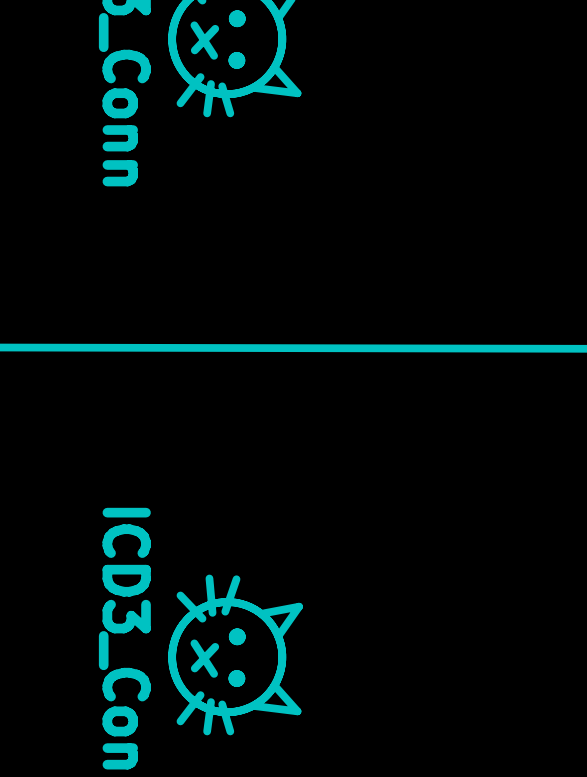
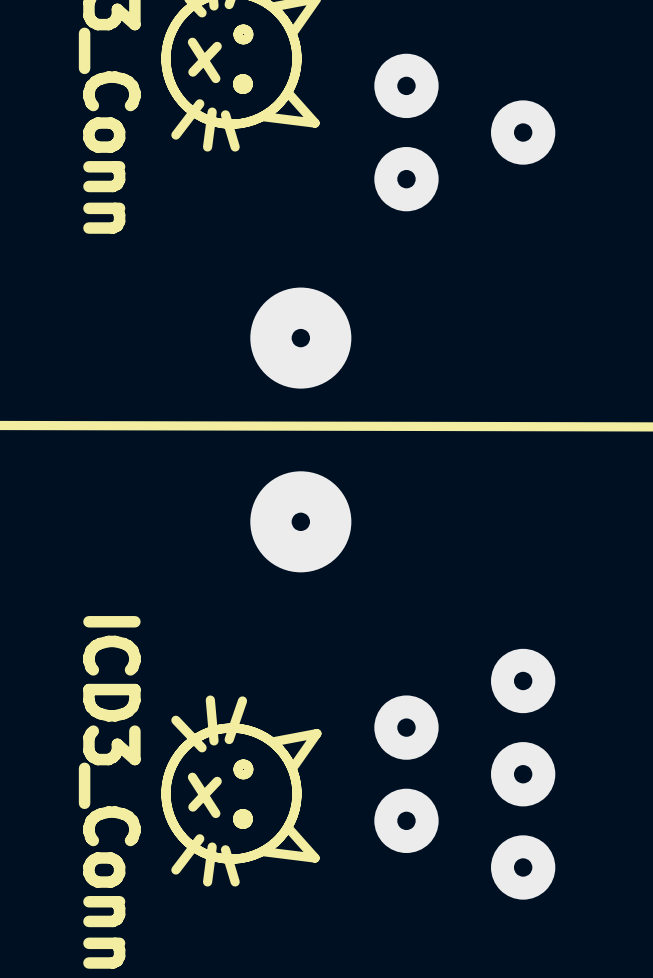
via: none -> (406, 85)
via: none -> (523, 132)
via: none -> (406, 179)
via: none -> (300, 338)
via: none -> (300, 521)
via: none -> (523, 680)
via: none -> (406, 727)
via: none -> (523, 774)
via: none -> (406, 820)
via: none -> (523, 867)

